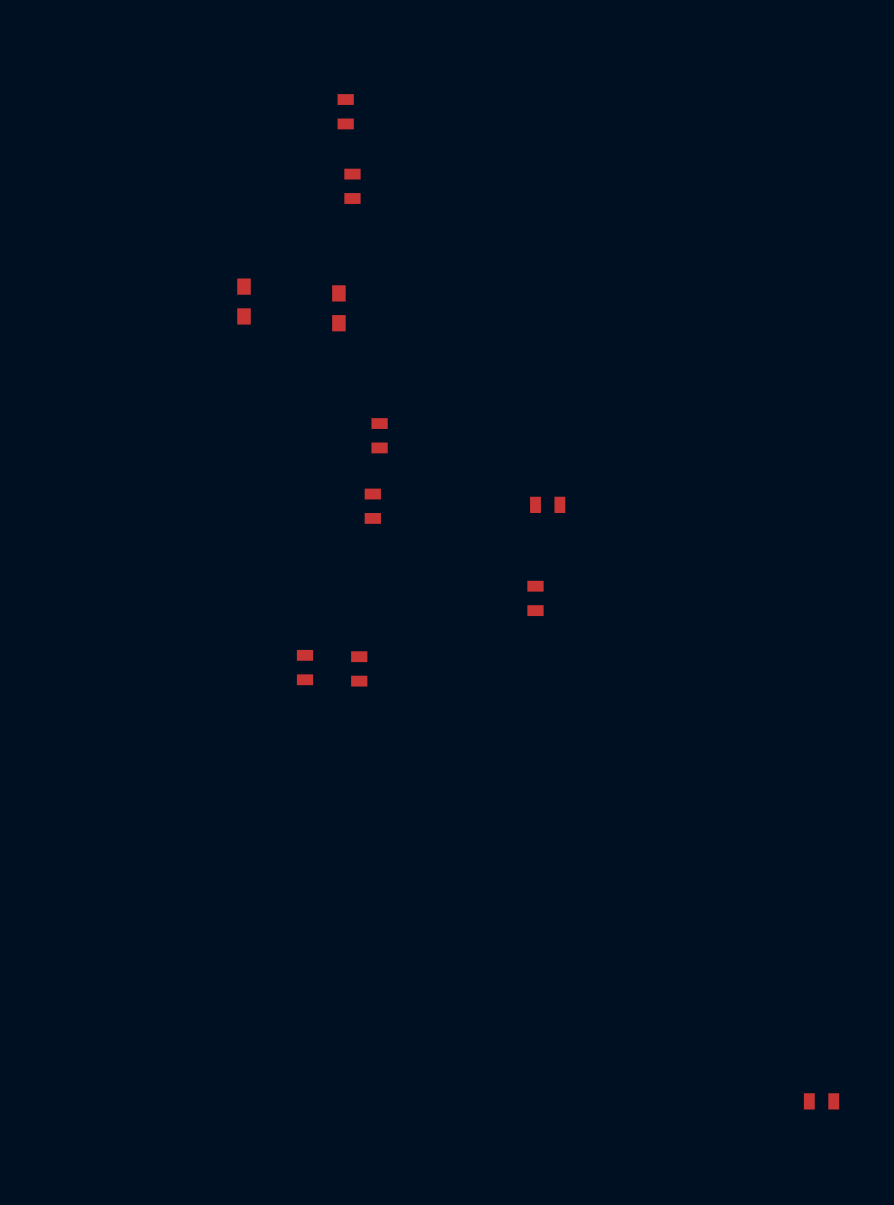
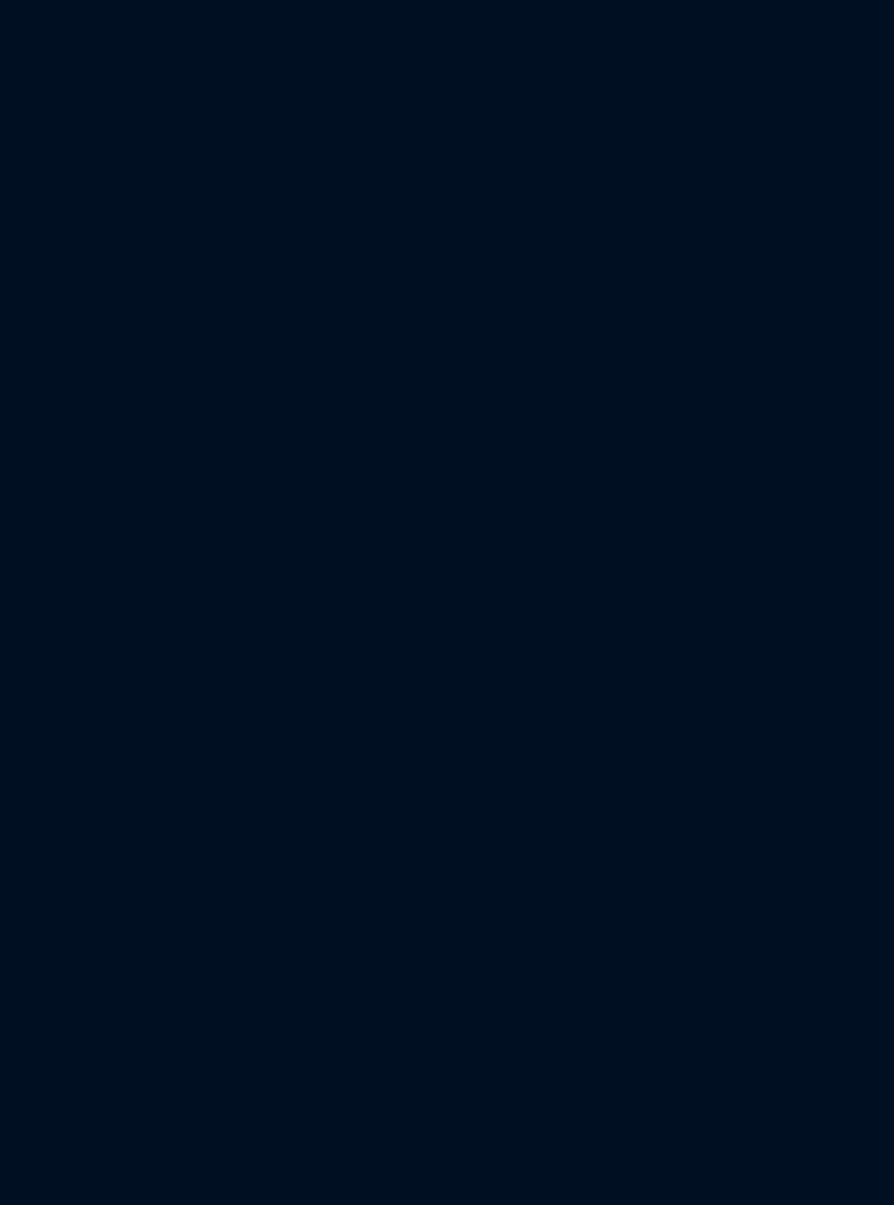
part: (345, 111) -> none
part: (352, 186) -> none
part: (244, 301) -> none
part: (338, 308) -> none
part: (379, 435) -> none
part: (547, 504) -> none
part: (372, 506) -> none
part: (535, 598) -> none
part: (305, 667) -> none
part: (359, 668) -> none
part: (821, 1101) -> none

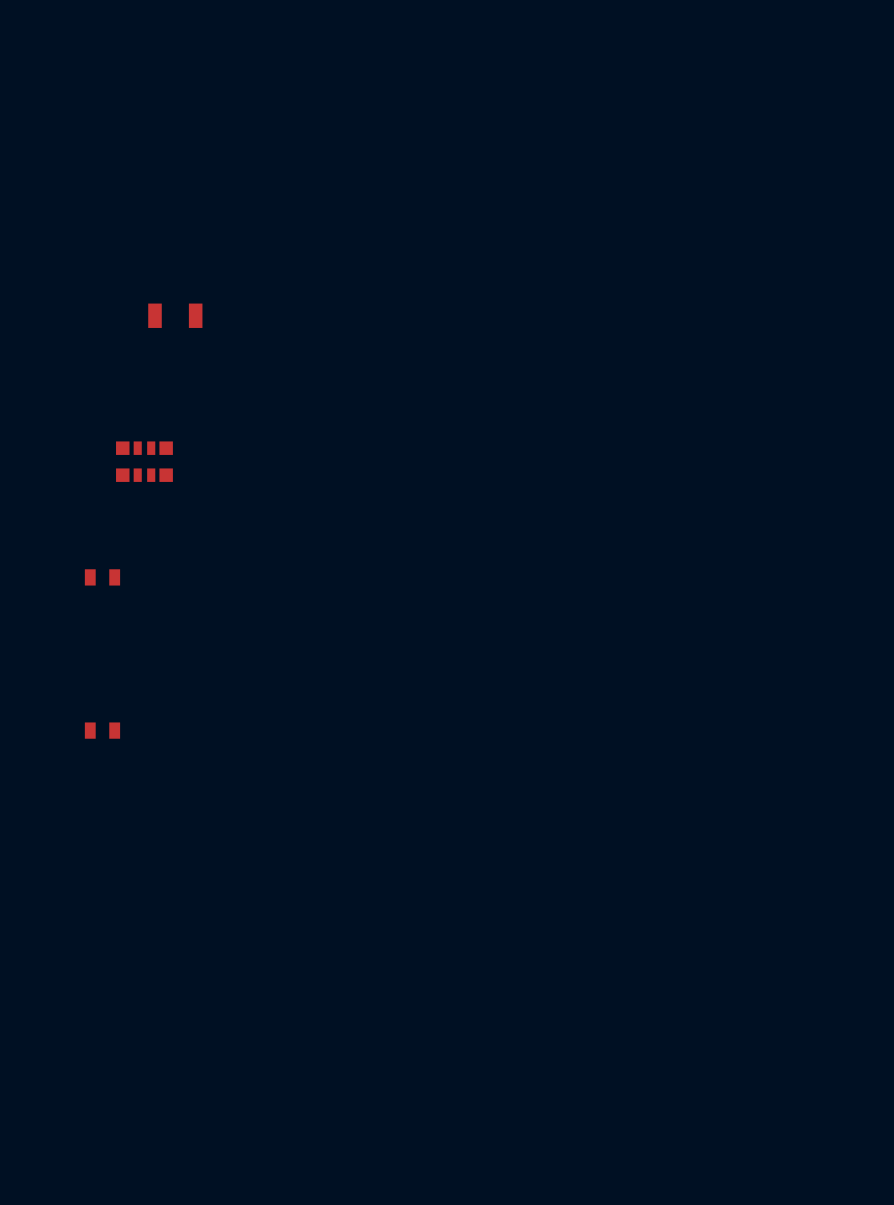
part: none -> (175, 315)
part: none -> (144, 461)
part: none -> (102, 577)
part: none -> (102, 730)

